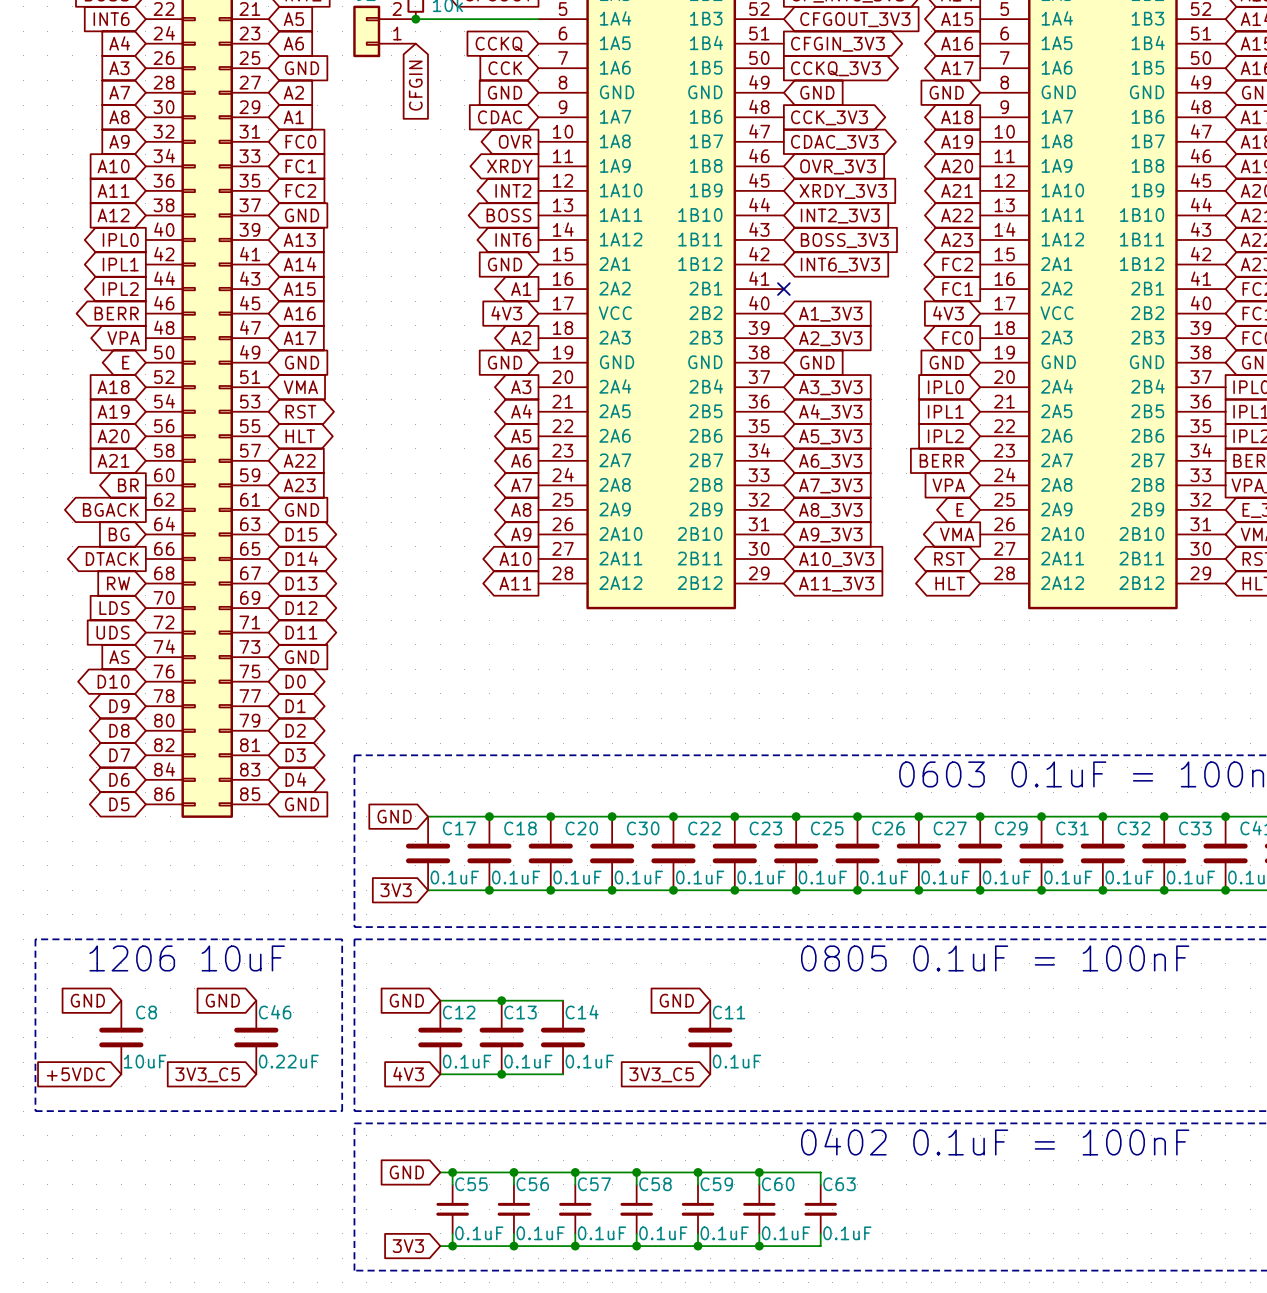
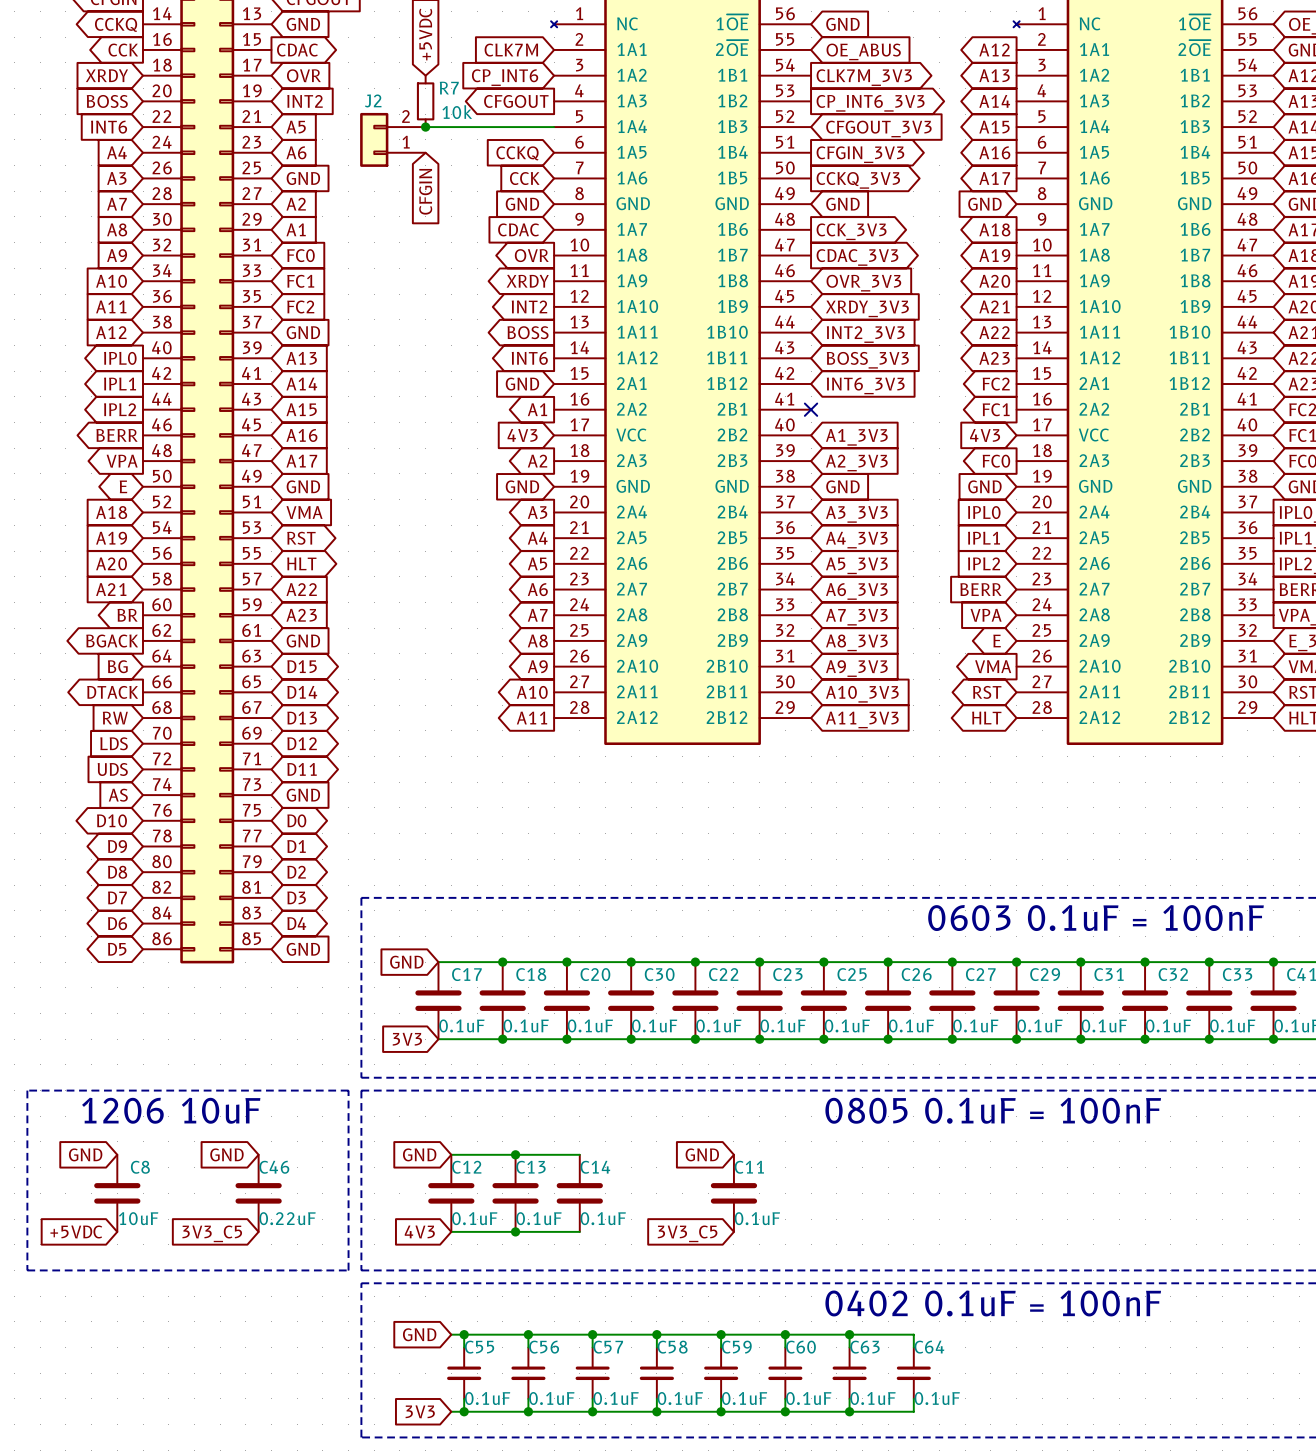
wire: none -> (849, 1334) (913, 1334) (913, 1347)
junction: none -> (849, 1334)
C64: none -> 0.1uF (913, 1373)
wire: none -> (913, 1398) (913, 1411) (849, 1411)
junction: none -> (849, 1411)

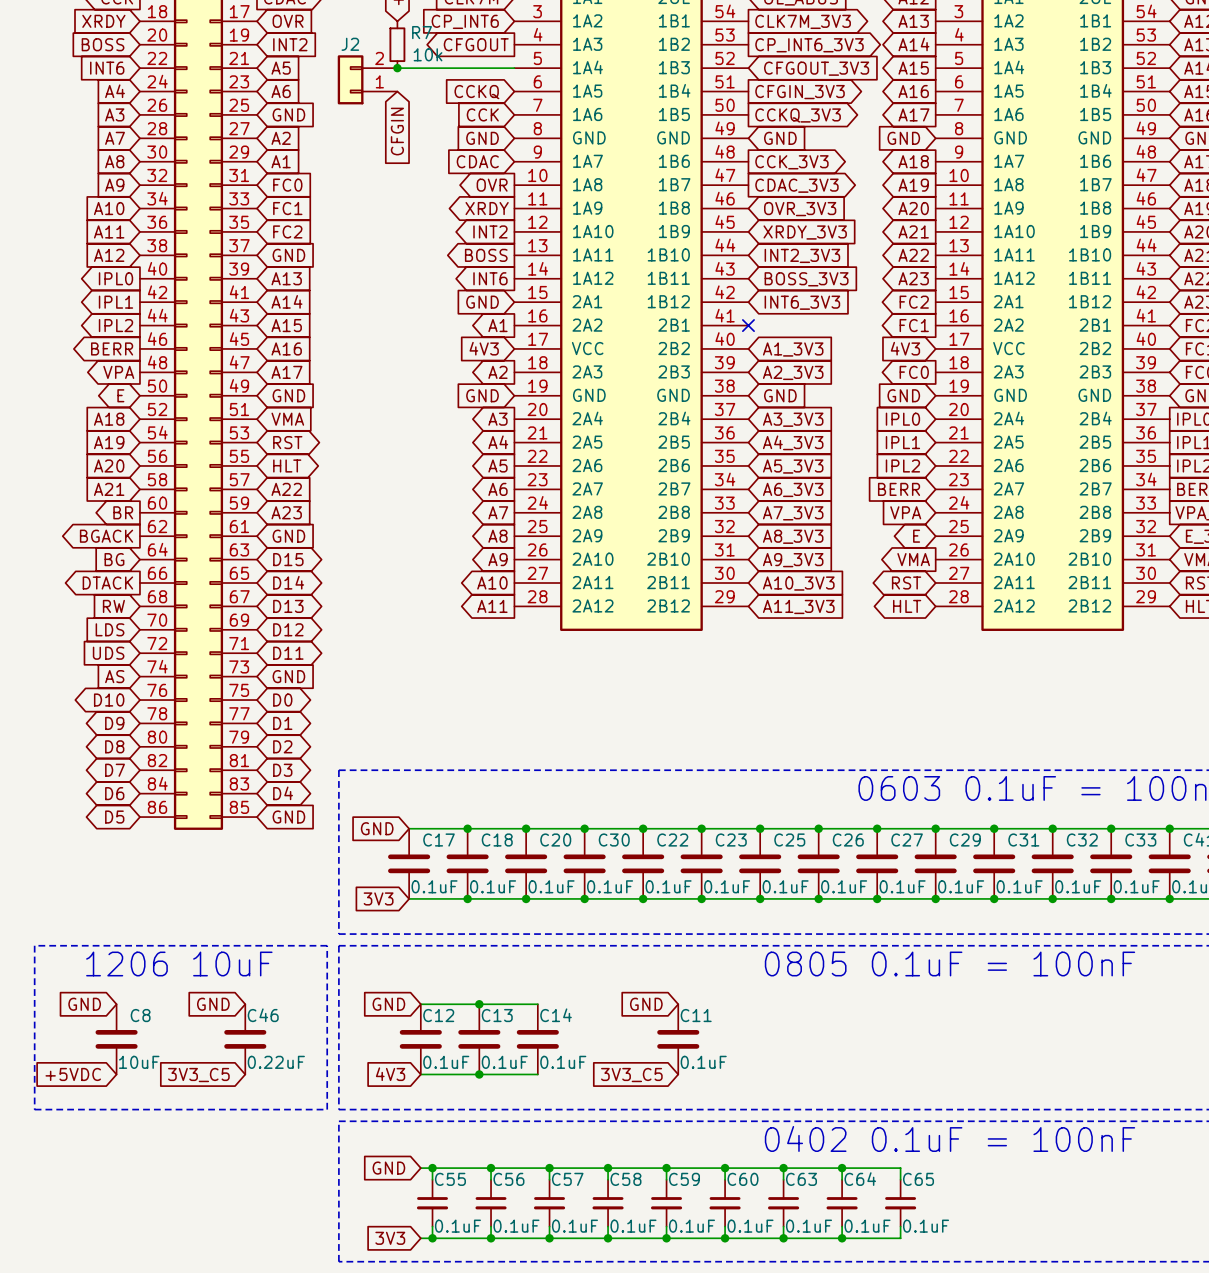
wire: none -> (842, 1168) (900, 1168) (900, 1179)
junction: none -> (842, 1168)
C65: none -> 0.1uF (900, 1203)
wire: none -> (900, 1226) (900, 1238) (842, 1238)
junction: none -> (842, 1238)

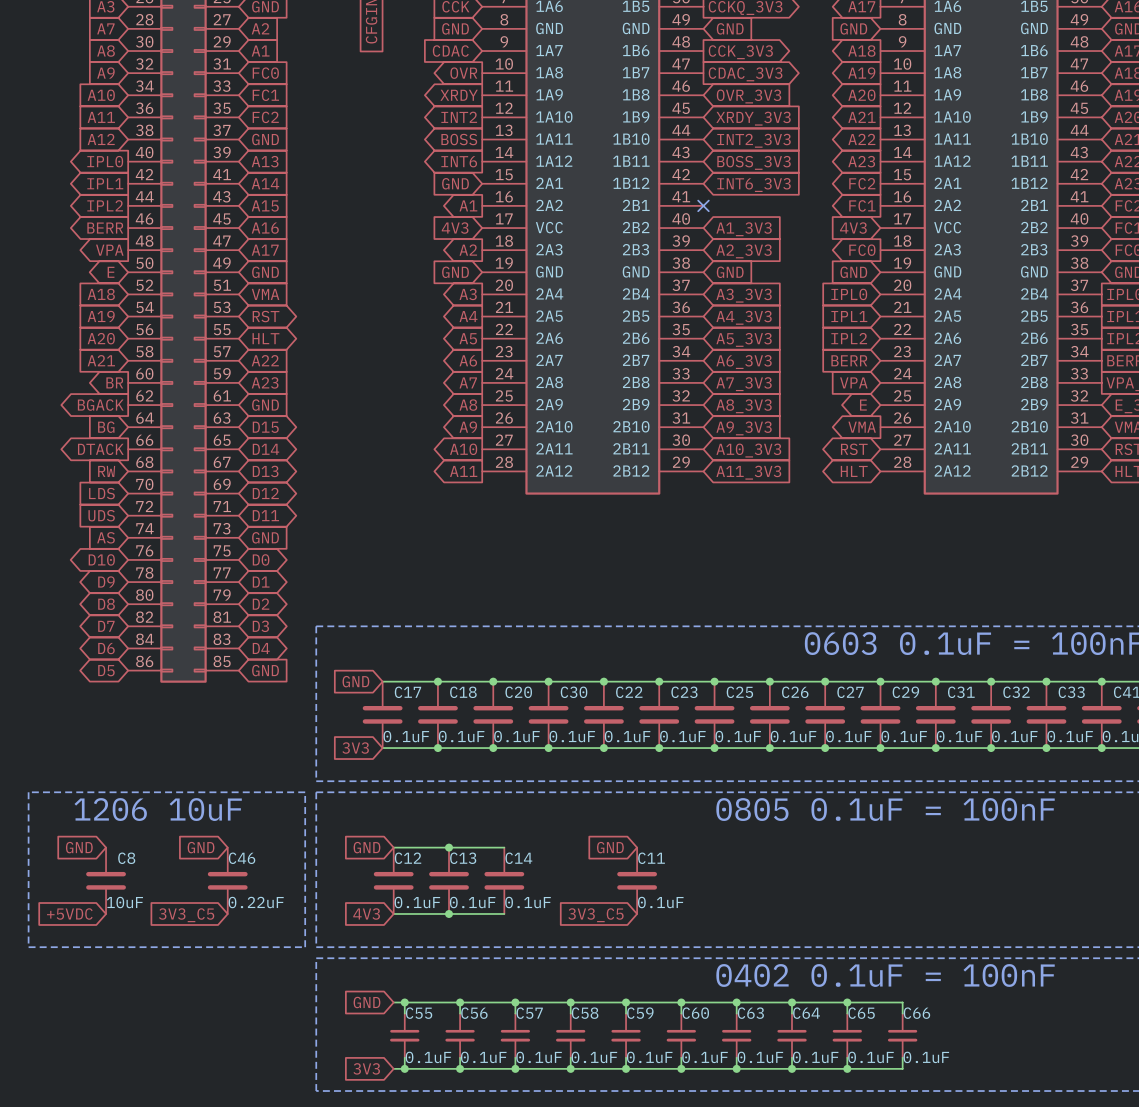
wire: none -> (847, 1002) (902, 1002) (902, 1013)
junction: none -> (847, 1002)
C66: none -> 0.1uF (902, 1035)
wire: none -> (902, 1057) (902, 1068) (847, 1068)
junction: none -> (847, 1068)

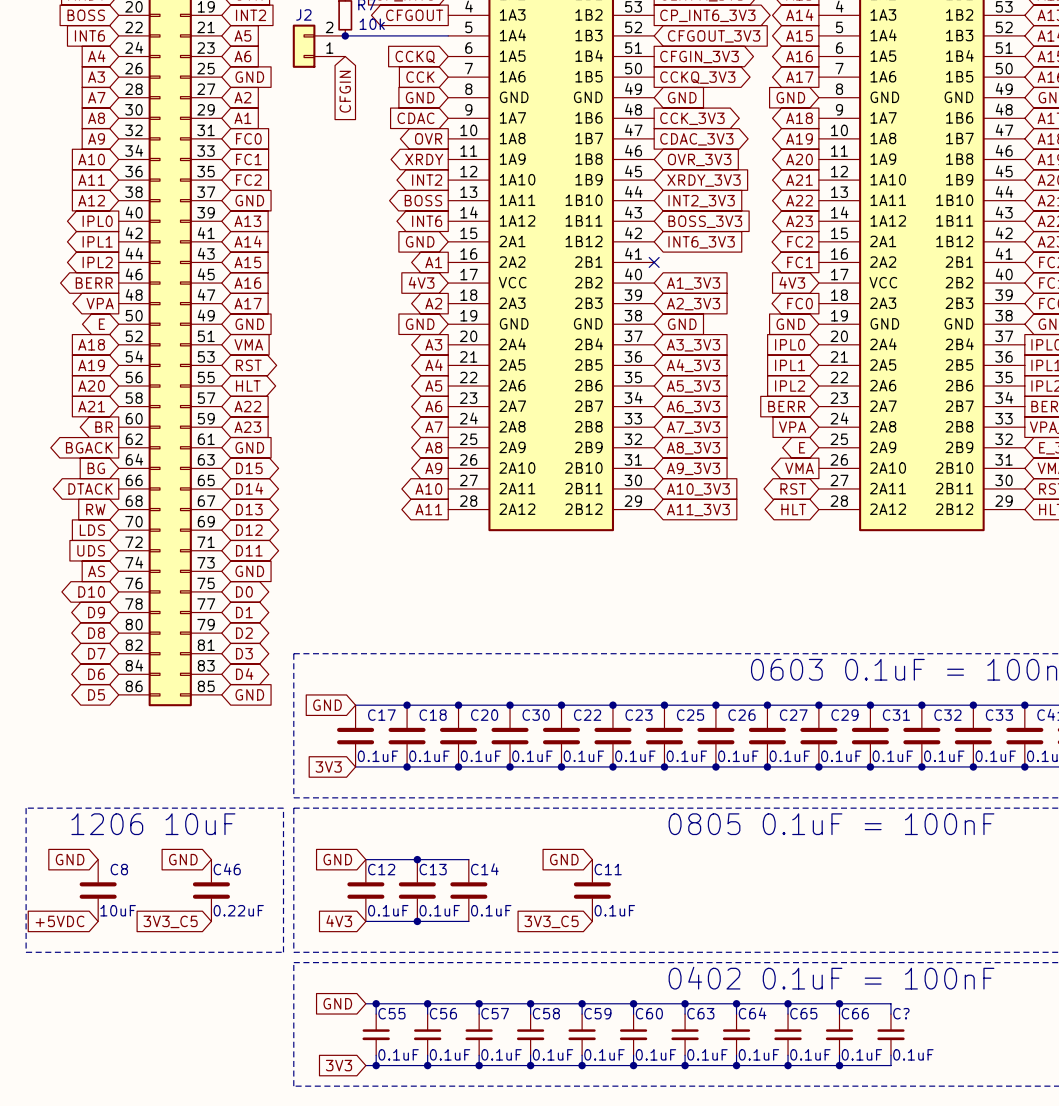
wire: none -> (839, 1003) (890, 1003) (890, 1014)
junction: none -> (839, 1003)
C?: none -> 0.1uF (890, 1034)
wire: none -> (890, 1055) (890, 1065) (839, 1065)
junction: none -> (839, 1065)

